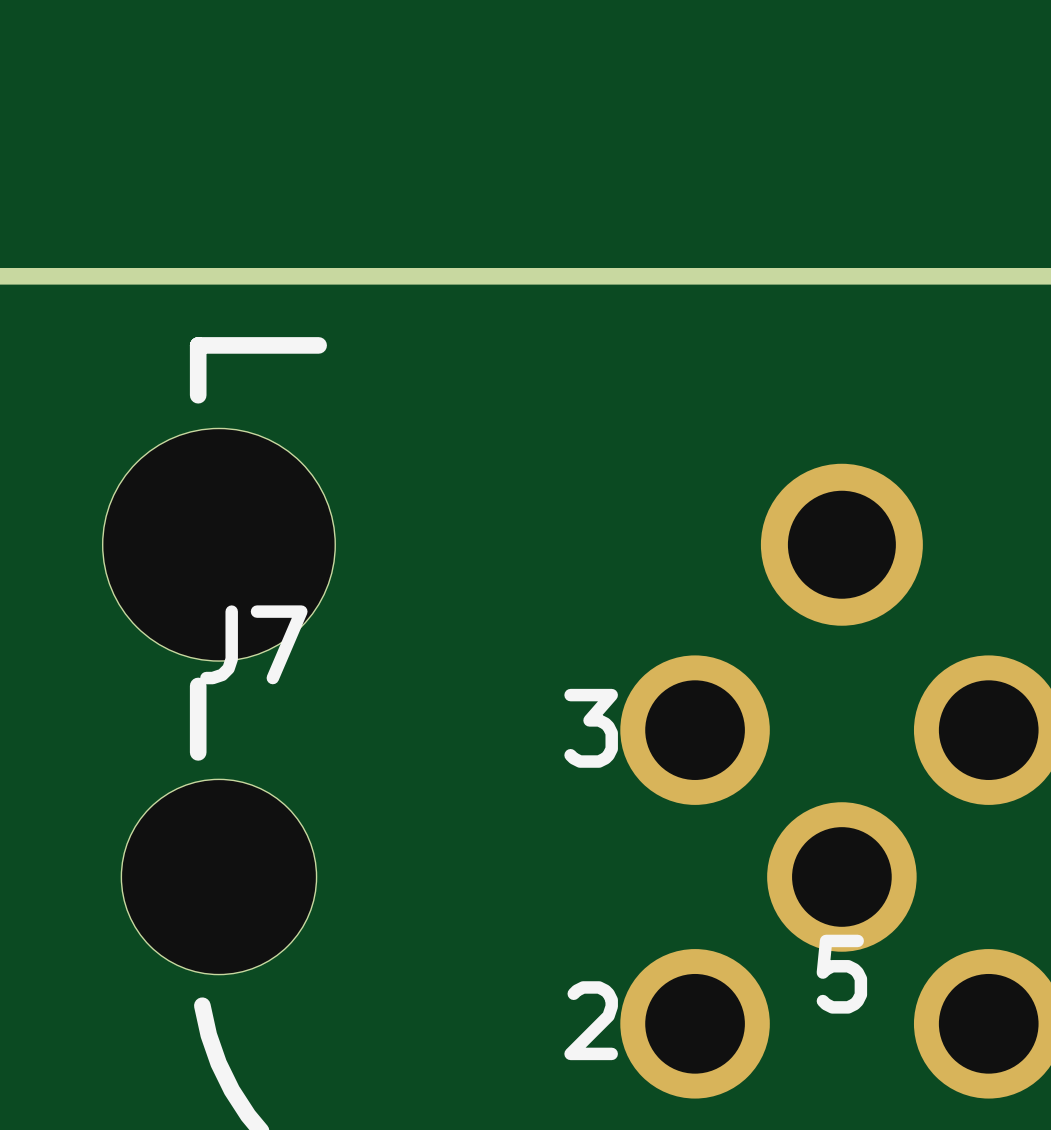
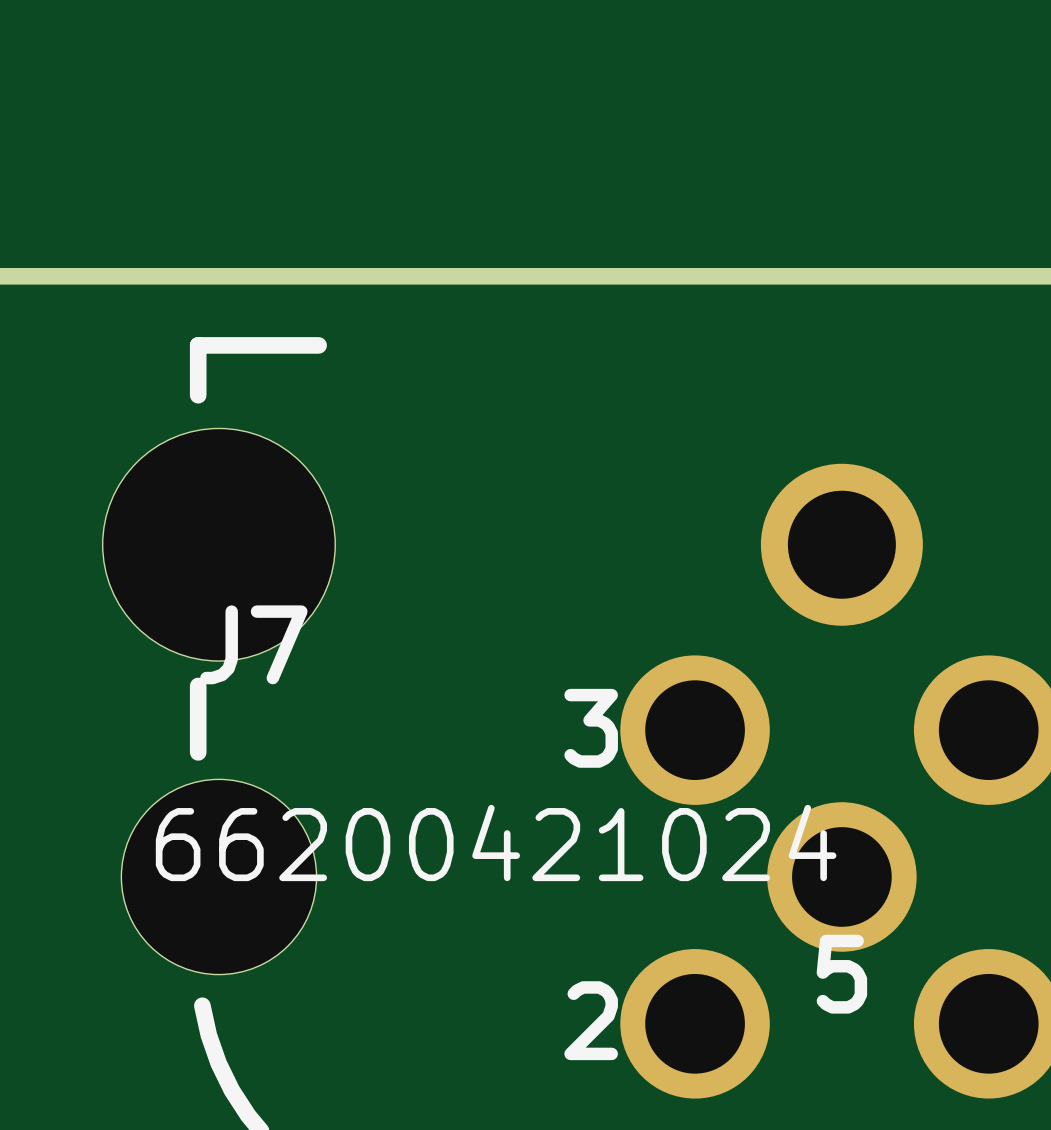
J7 value: none -> 66200421024 (496, 842)

